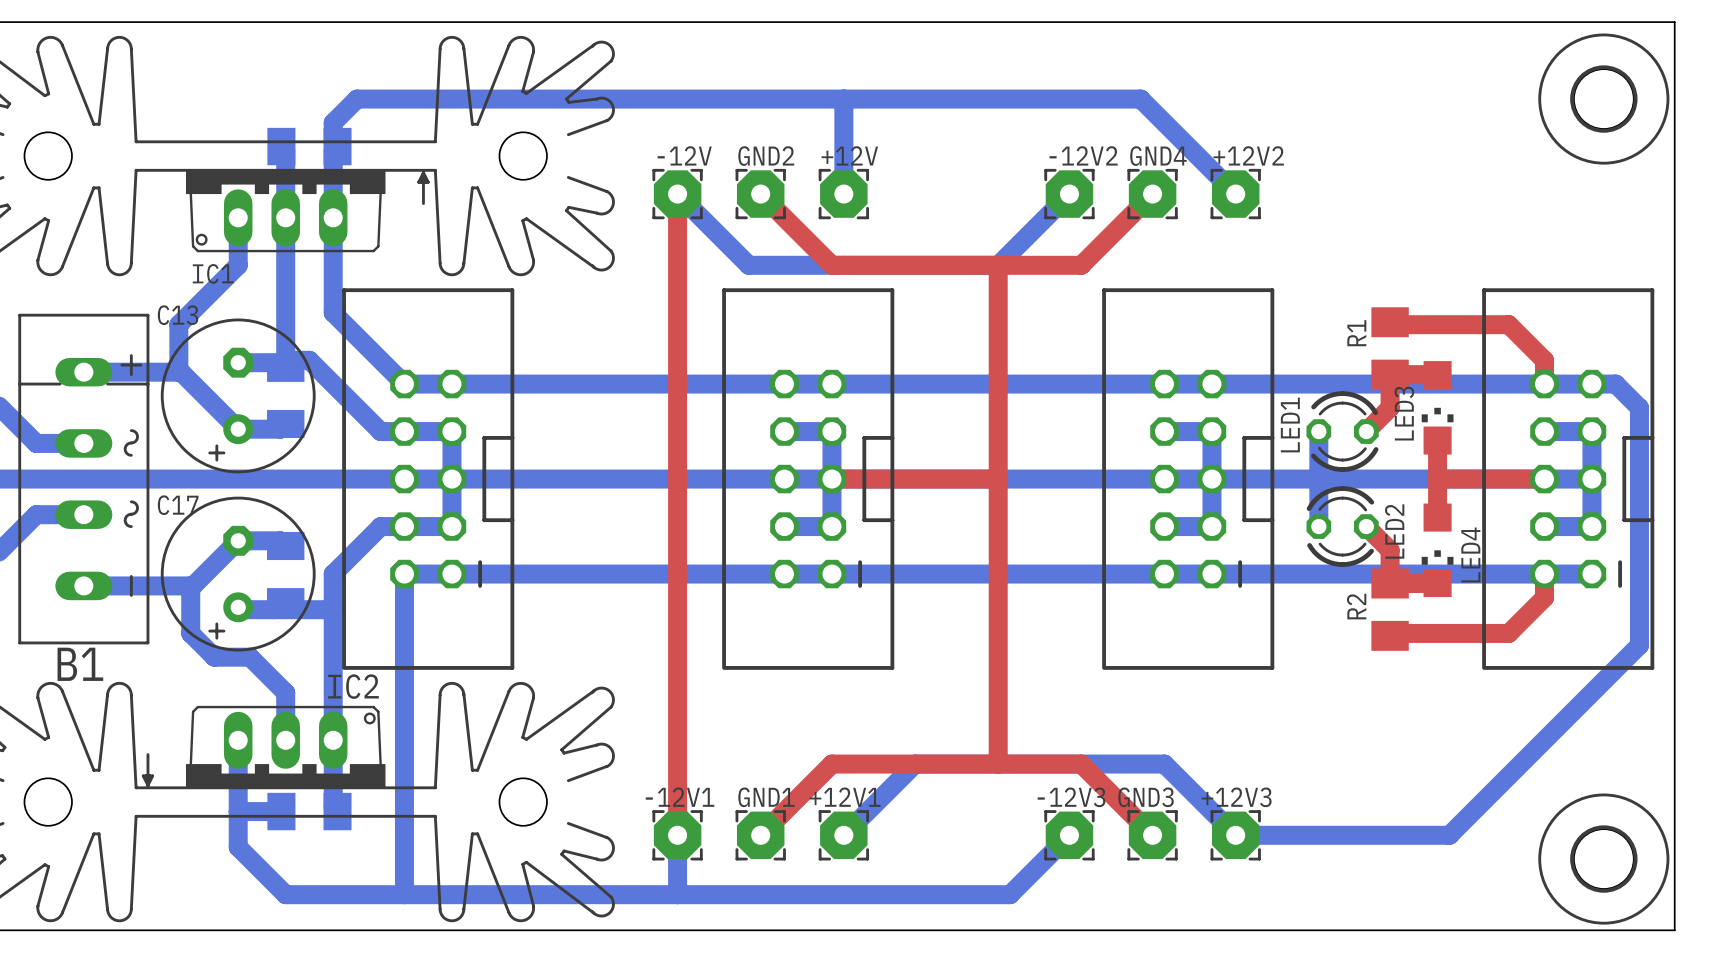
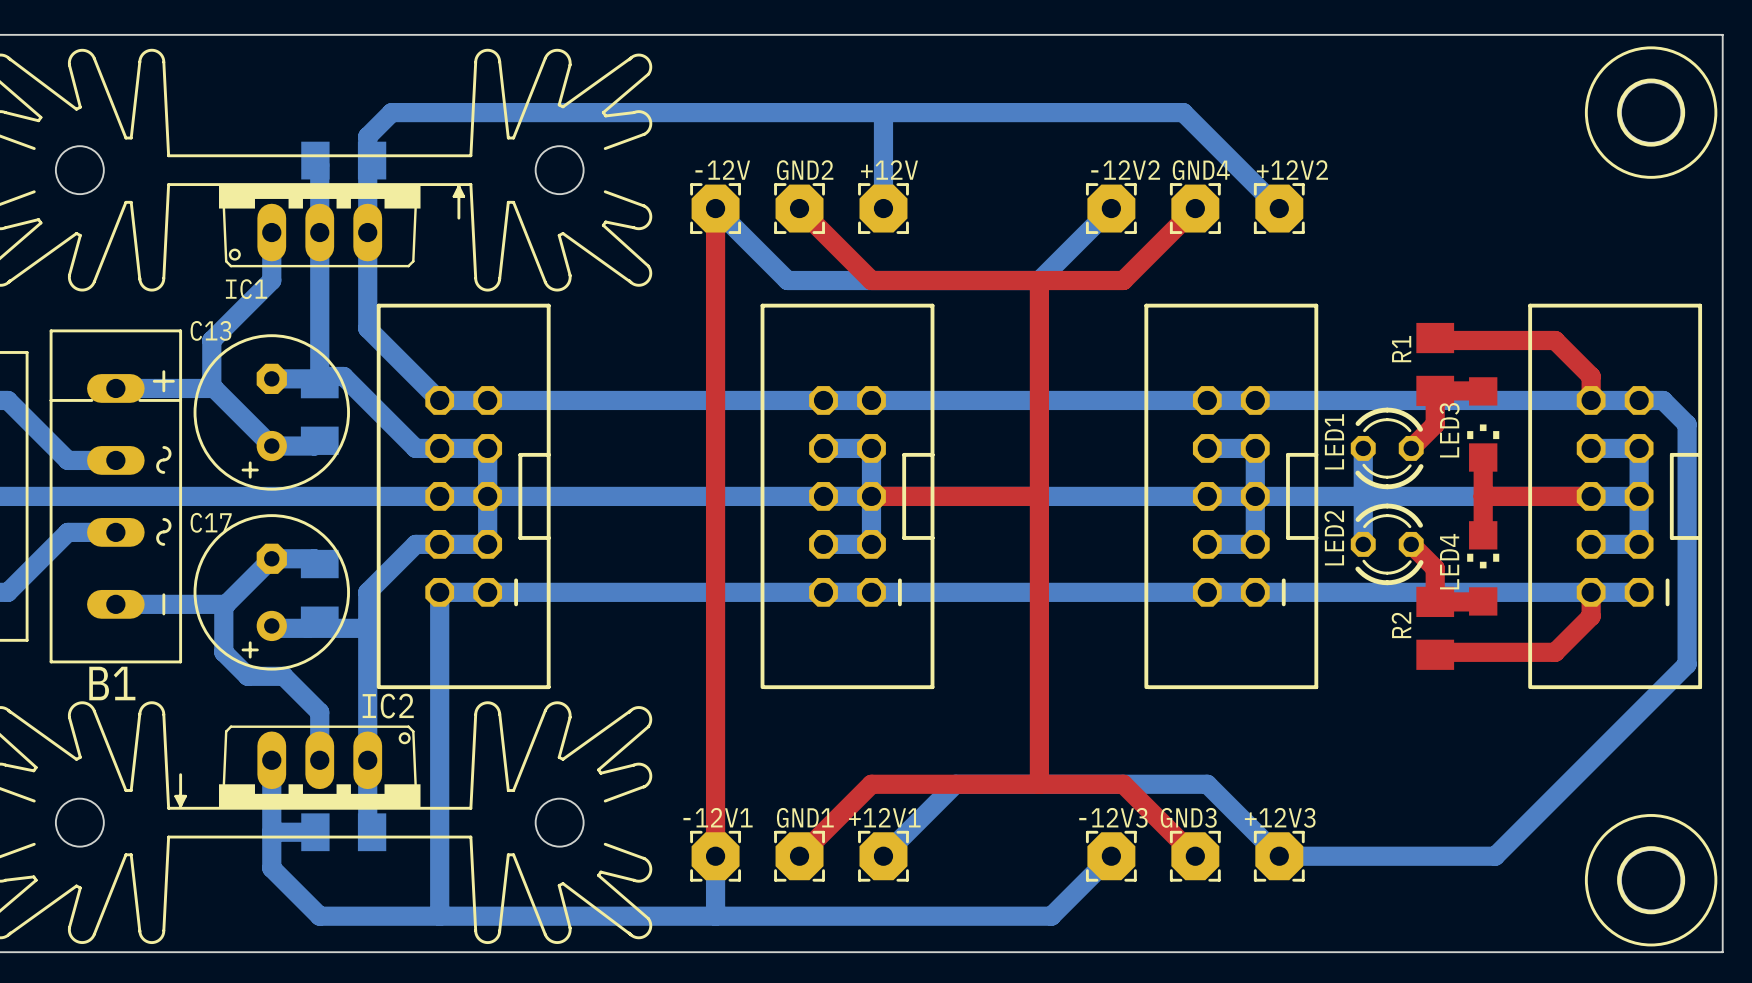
LED2 rotation: 0° (1342, 526) -> 180° (1387, 544)
LED4 rotation: 0° (1437, 550) -> 180° (1483, 568)

